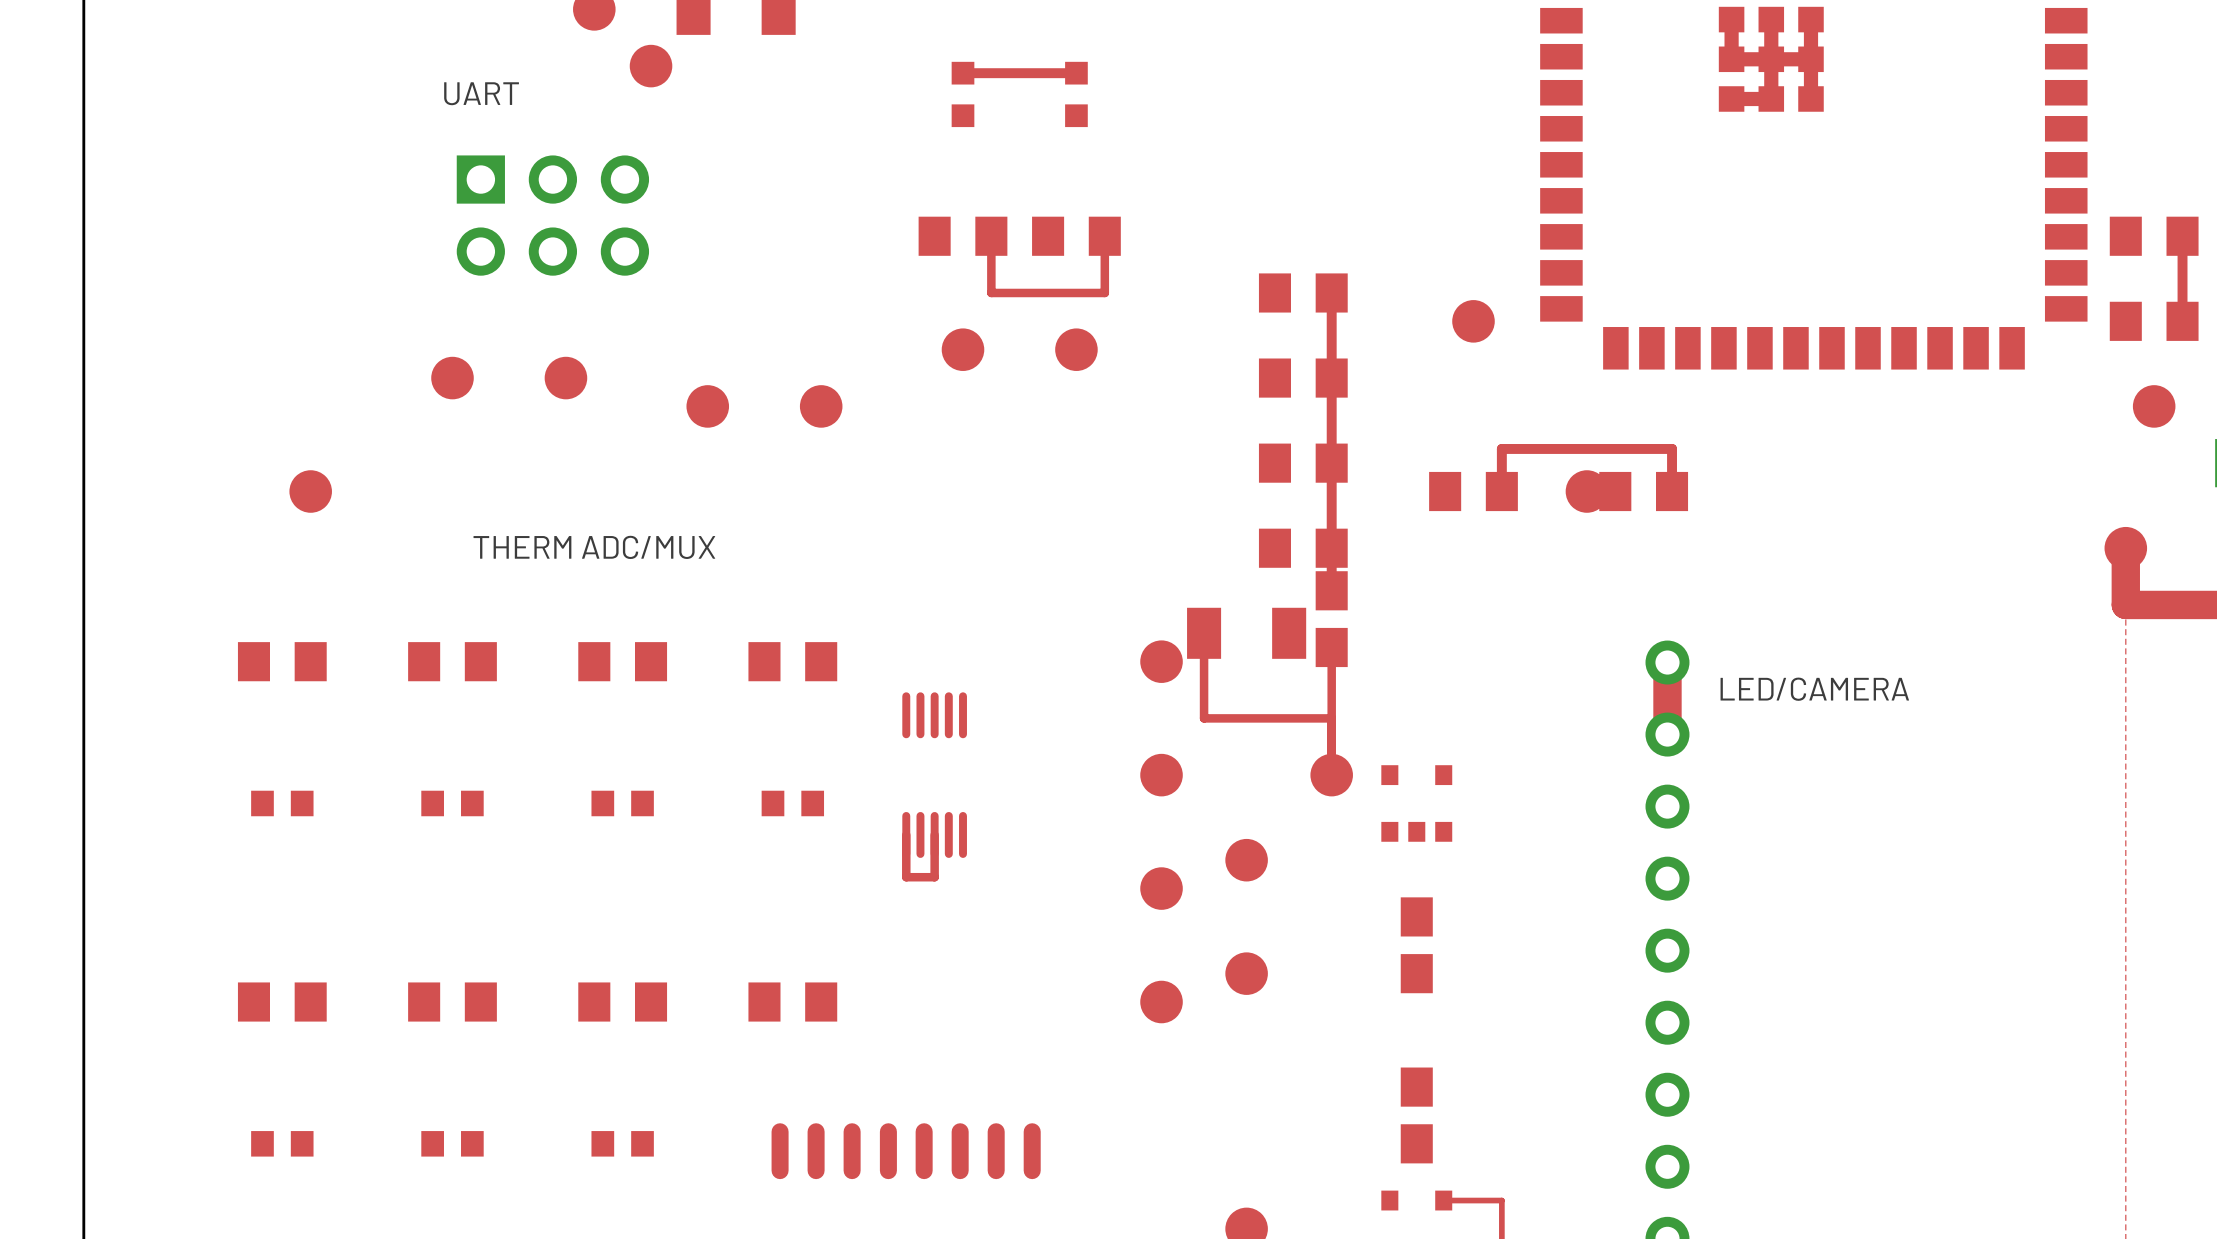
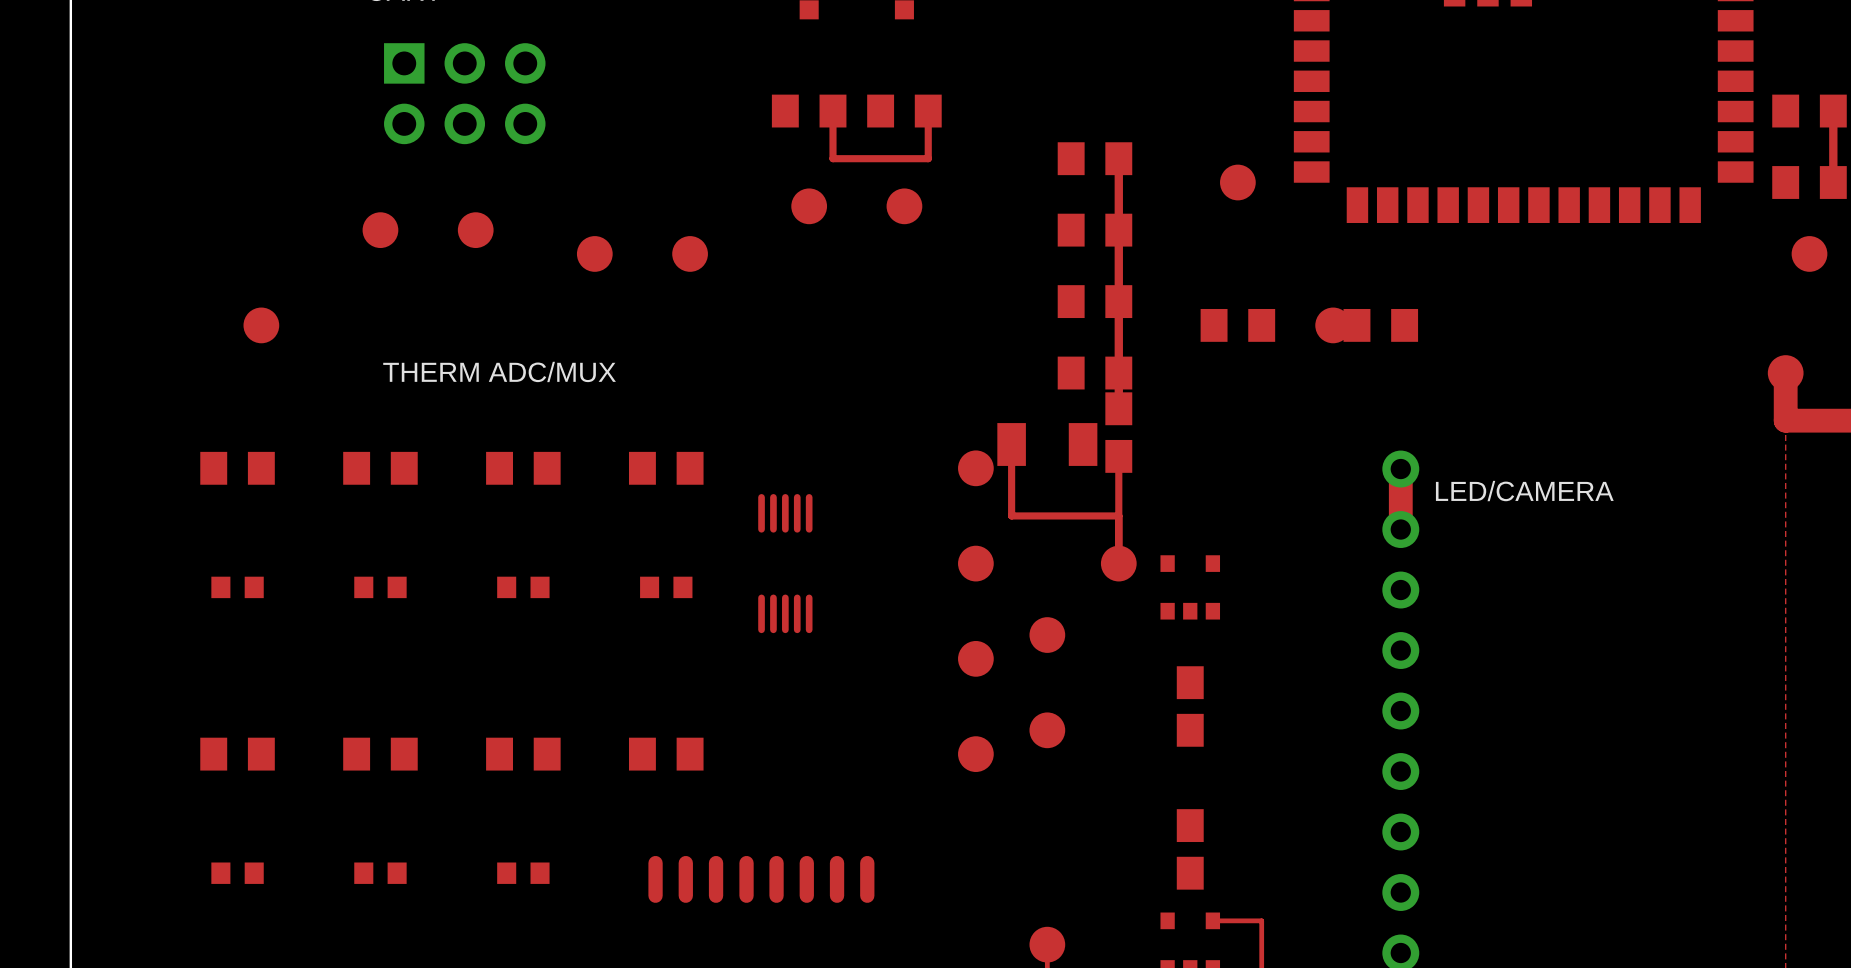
track: (1501, 491) (1501, 448) (1672, 448) (1672, 491) -> none
track: (906, 834) (906, 877) (934, 877) (934, 834) -> none

